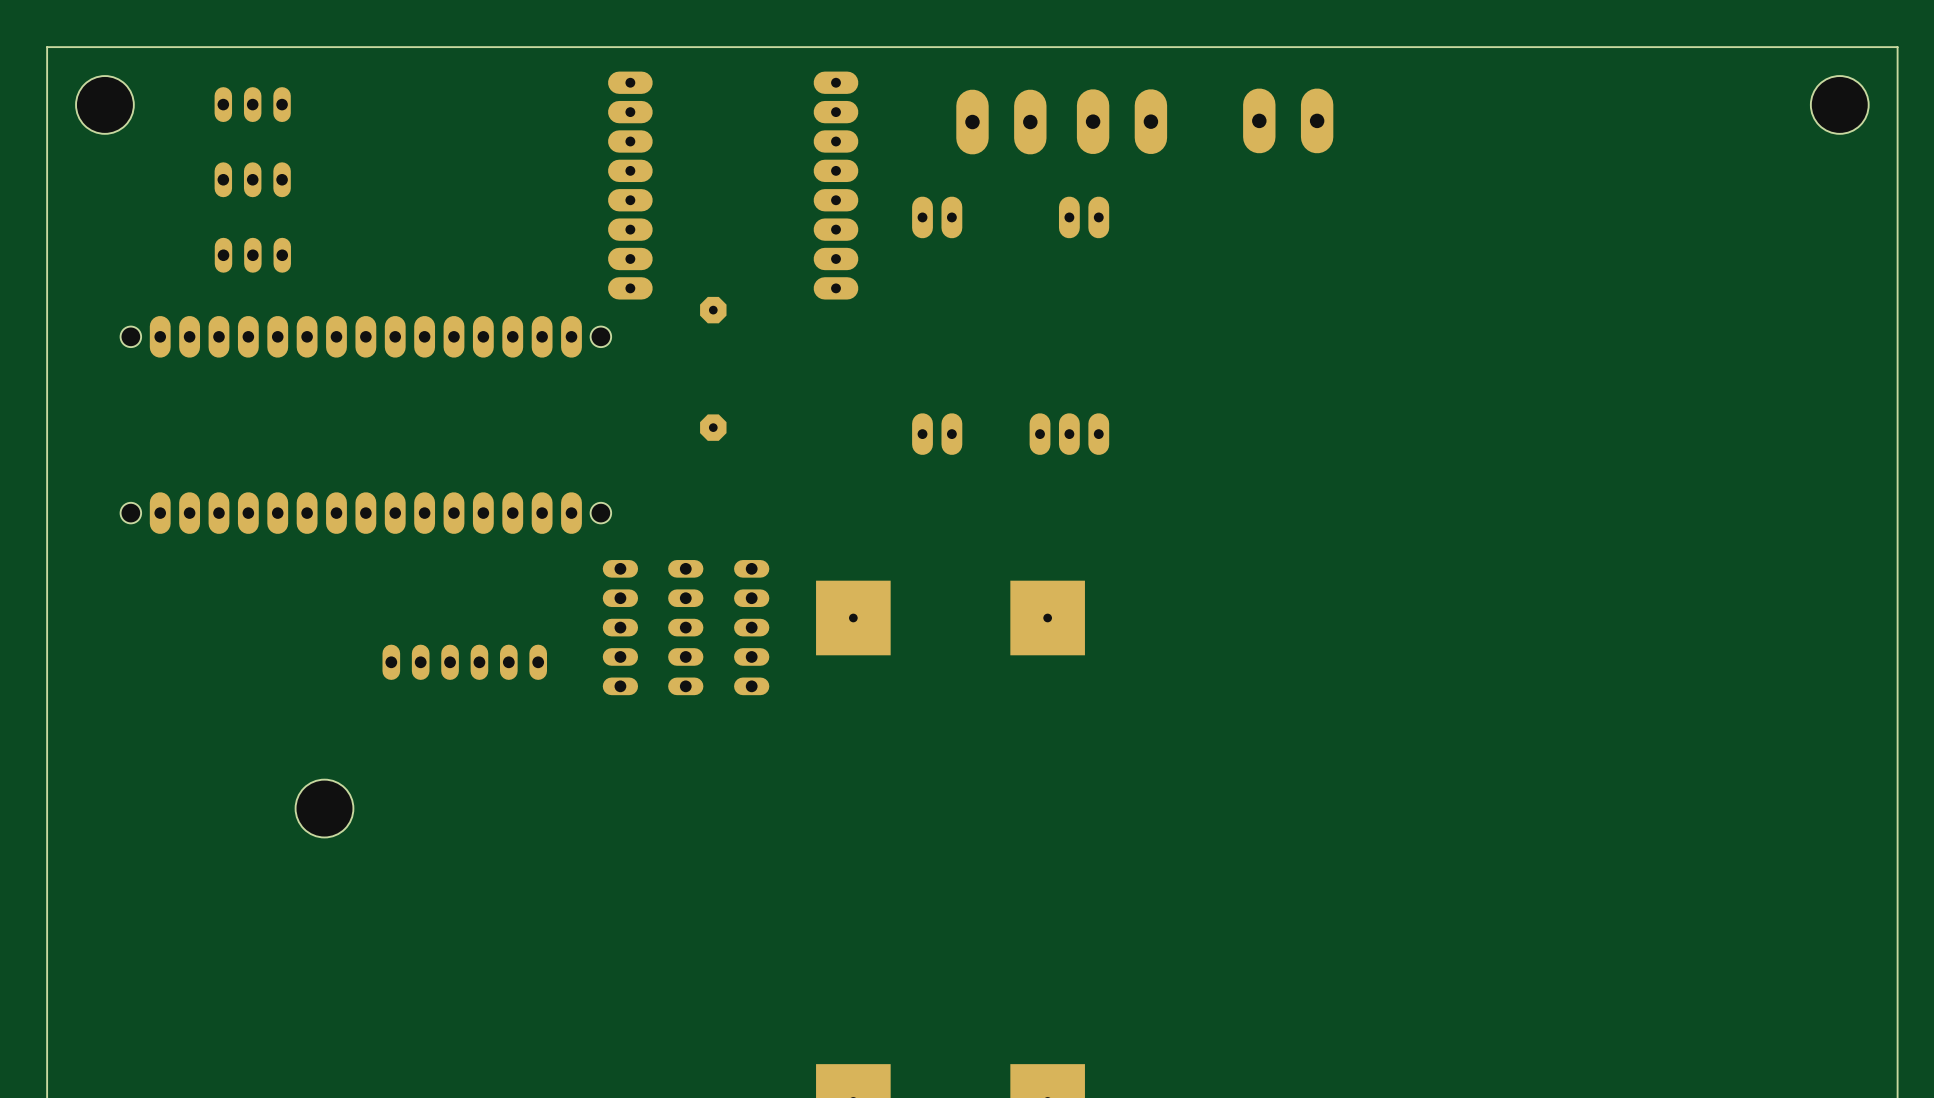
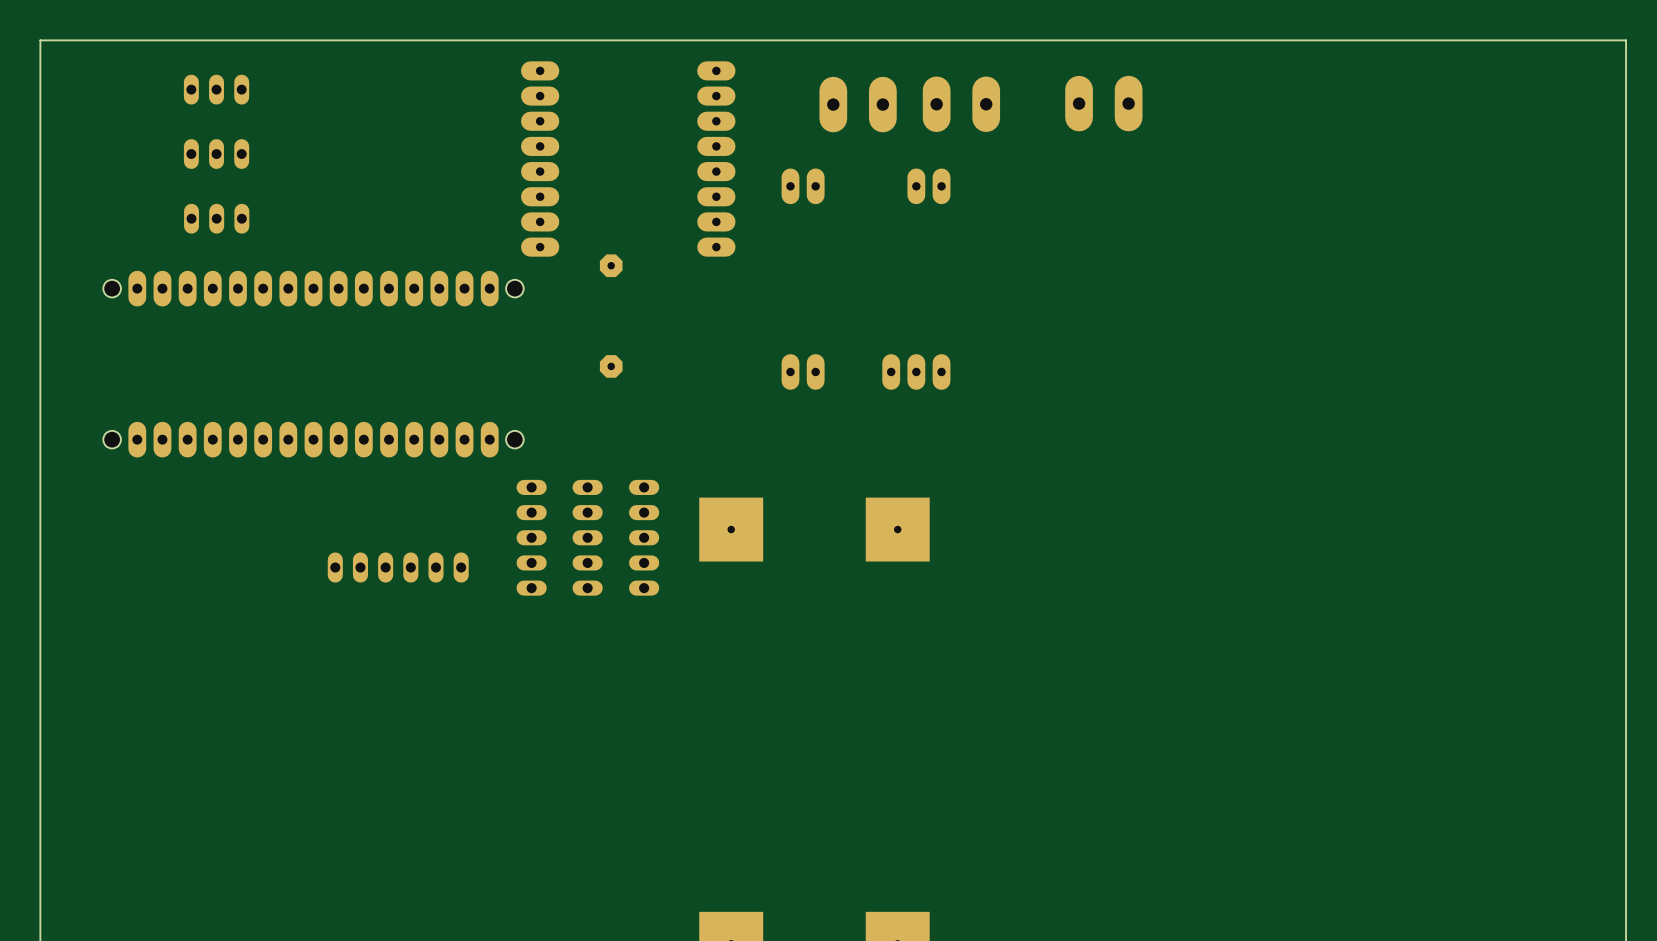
hole: (104, 104) -> none
hole: (1839, 104) -> none
hole: (324, 808) -> none

